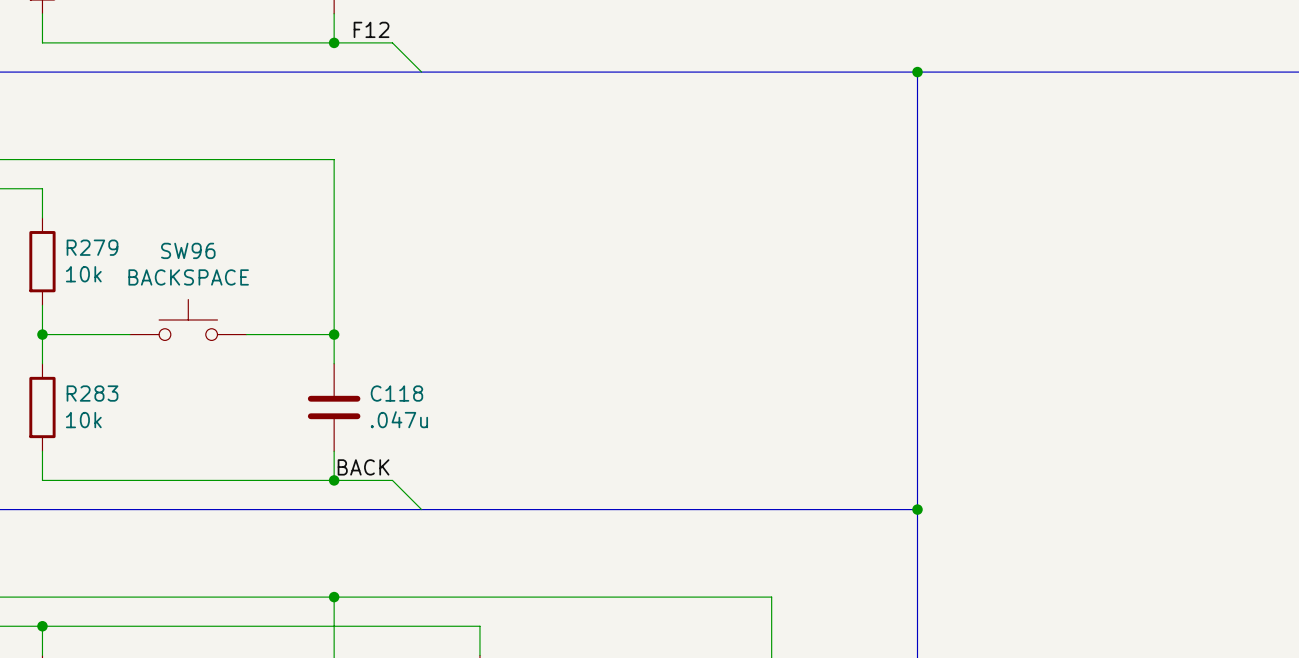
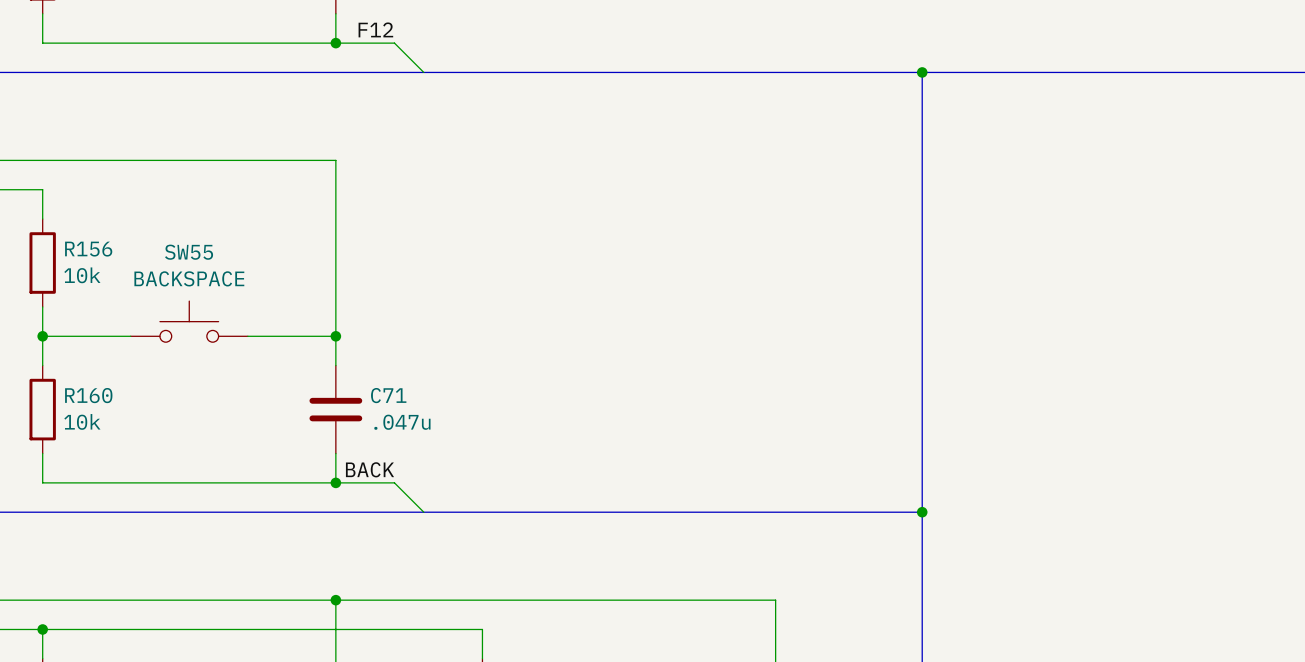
R279 name: R279 (92, 247) -> R156 (88, 249)
SW96 name: SW96 (188, 250) -> SW55 (189, 252)
R283 name: R283 (92, 393) -> R160 (88, 395)
C118 name: C118 (396, 393) -> C71 (388, 395)

